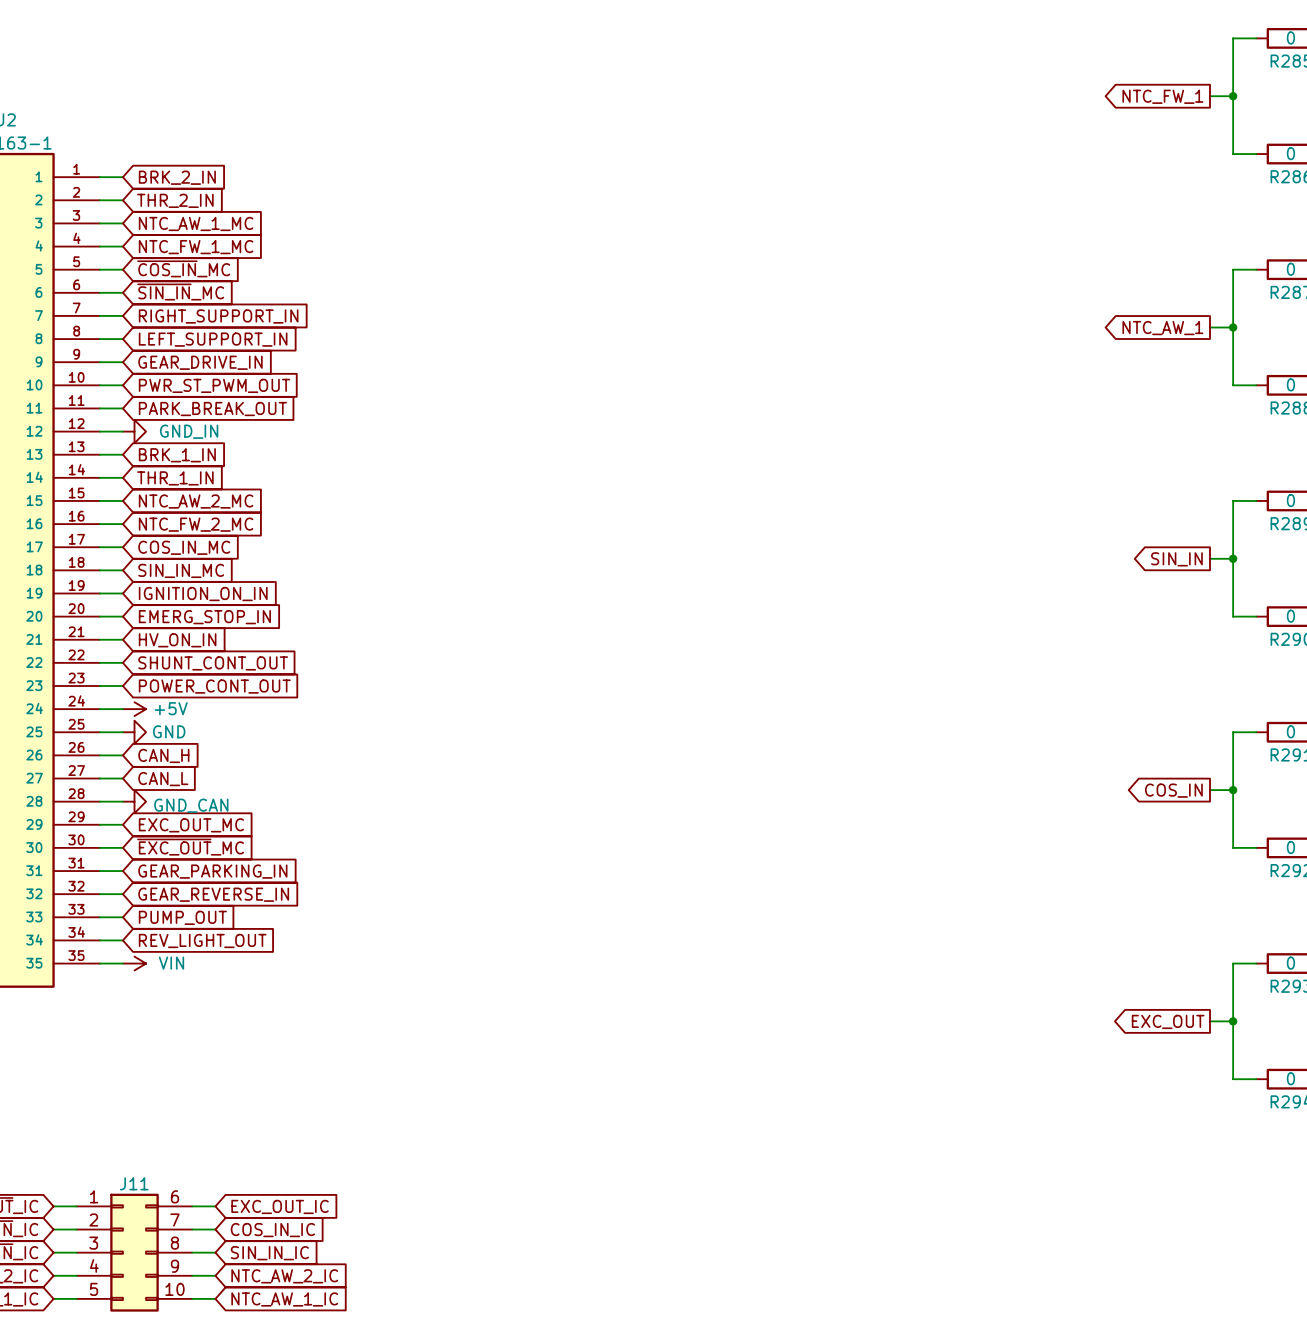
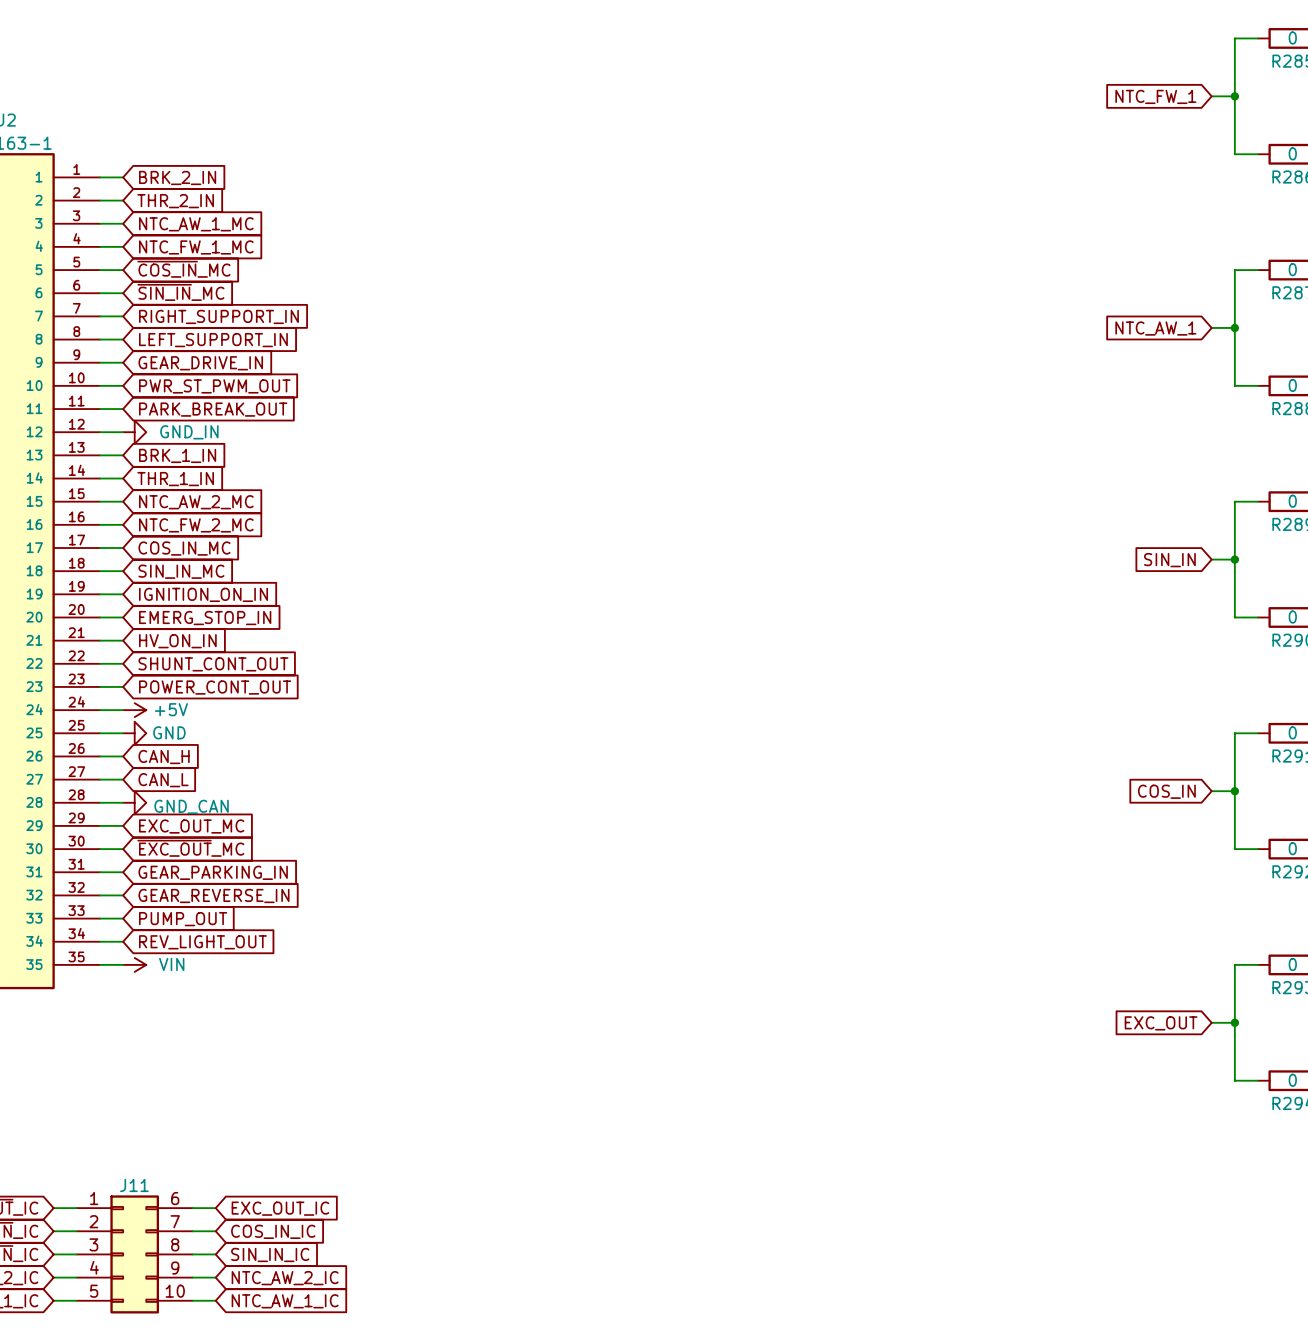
global label shape: output (1162, 96) -> input (1155, 96)
global label shape: output (1162, 328) -> input (1155, 328)
global label shape: output (1176, 559) -> input (1169, 560)
global label shape: output (1173, 790) -> input (1166, 791)
global label shape: output (1168, 1021) -> input (1161, 1023)

